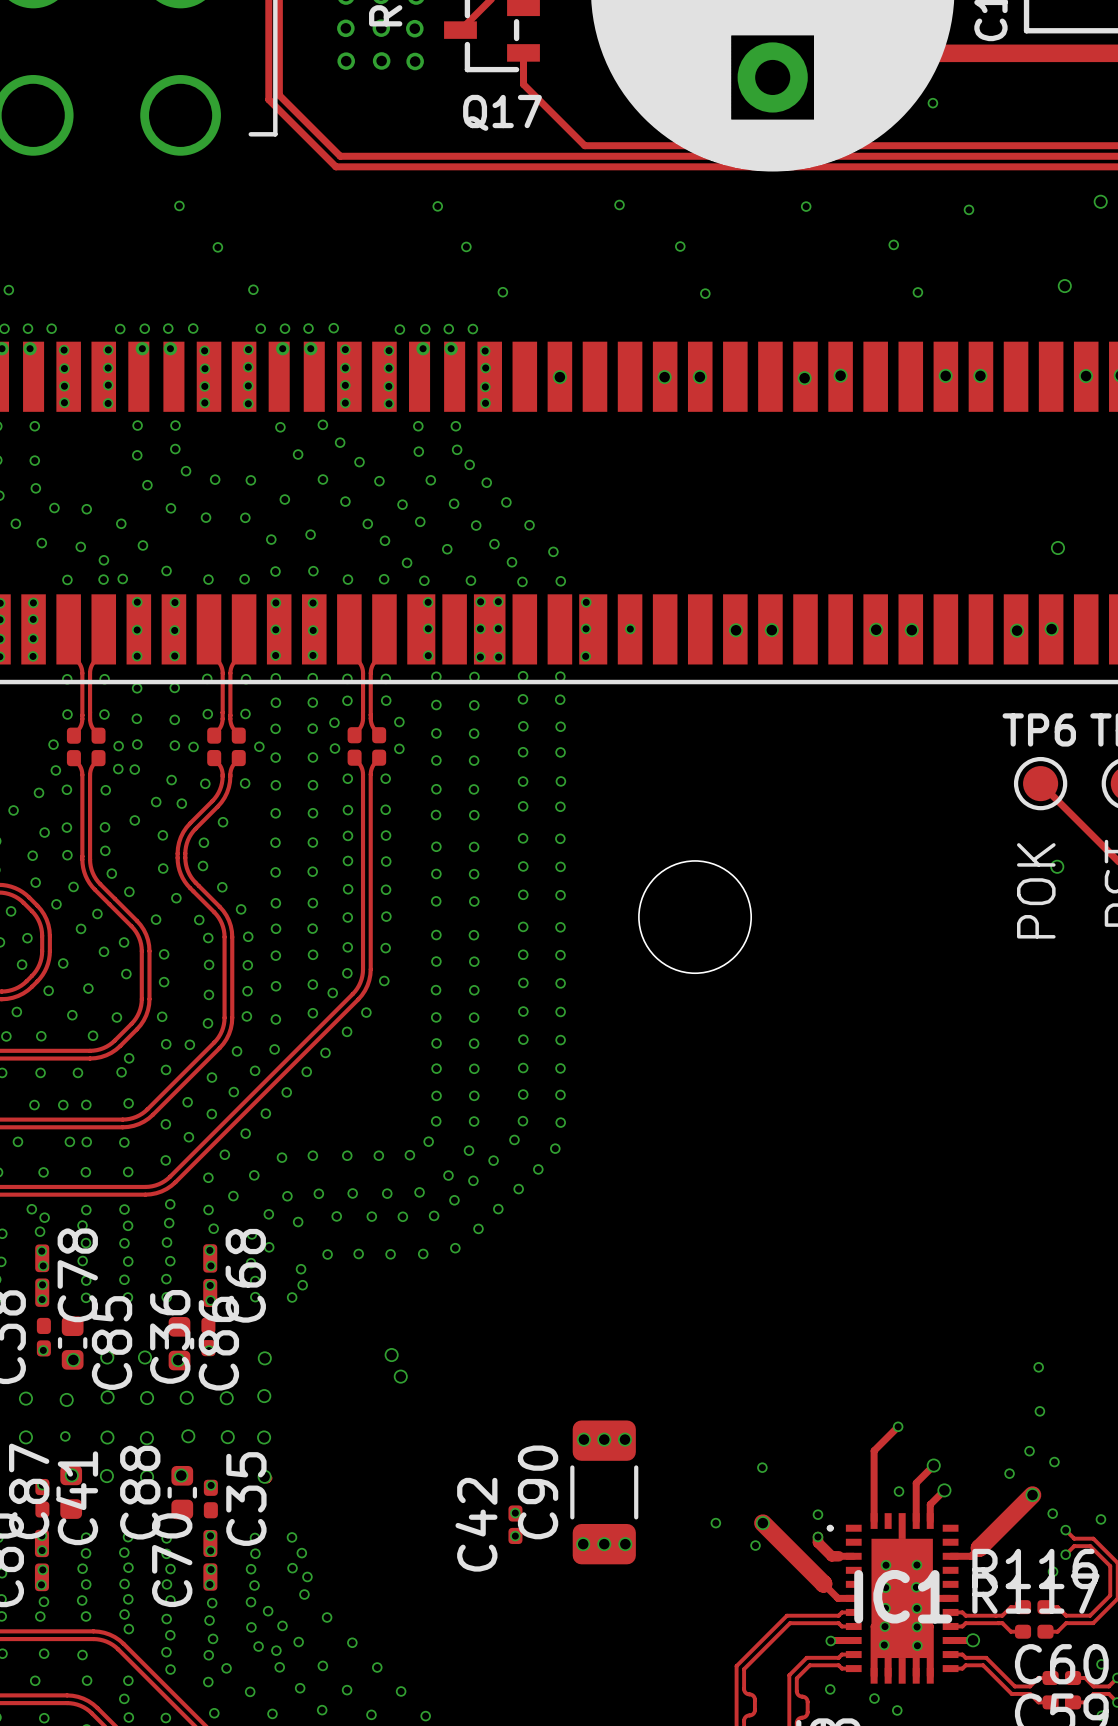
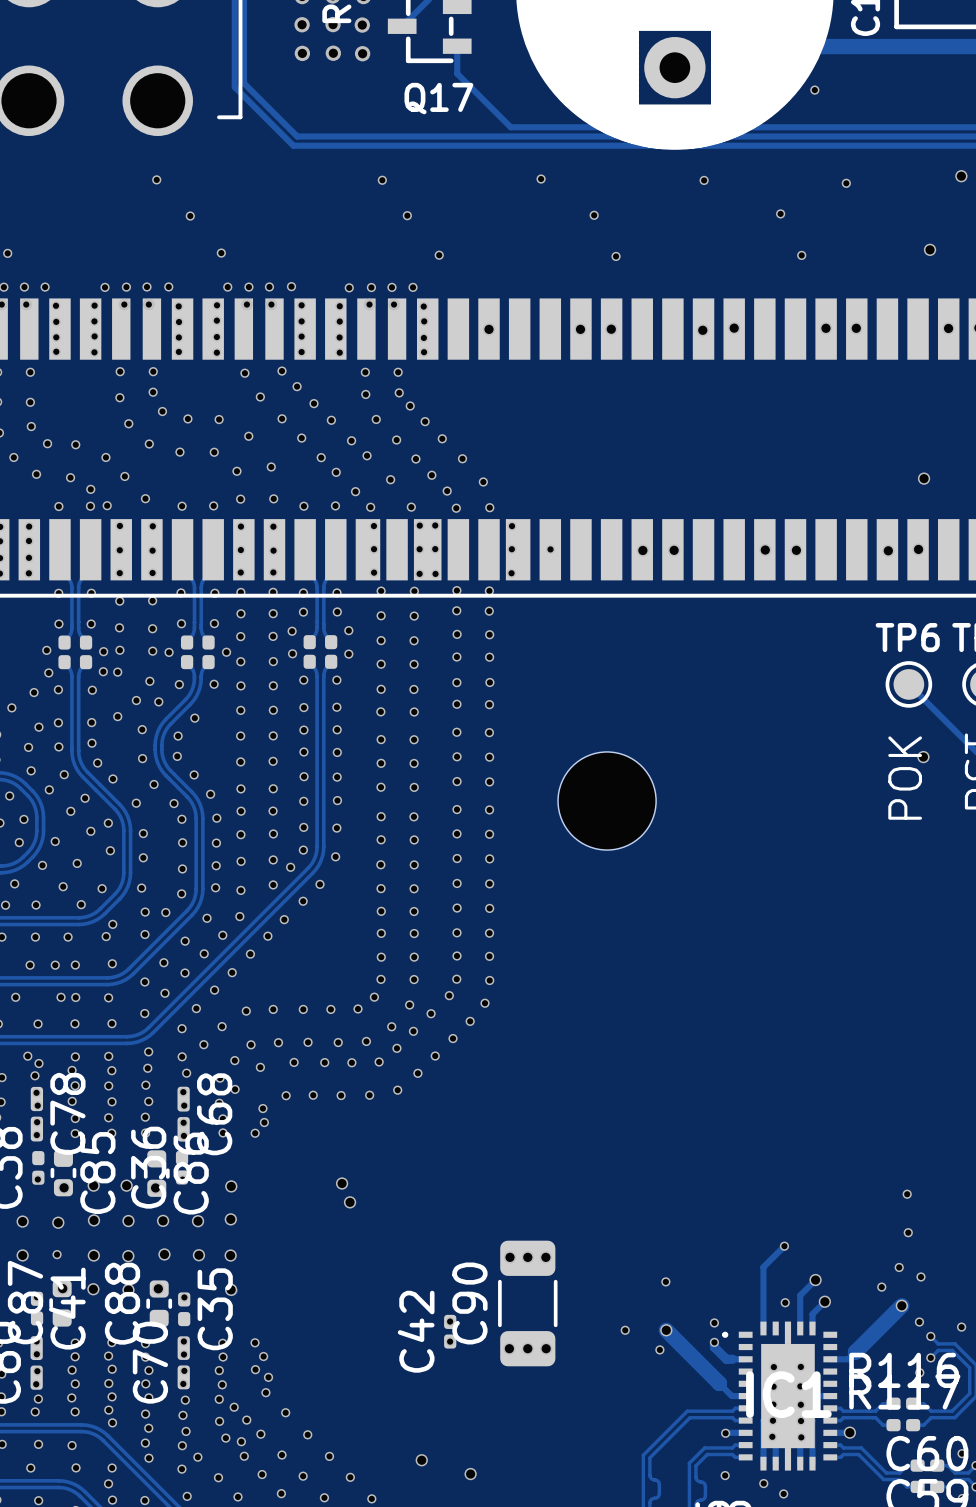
via: none -> (421, 1460)
via: none -> (470, 1474)

